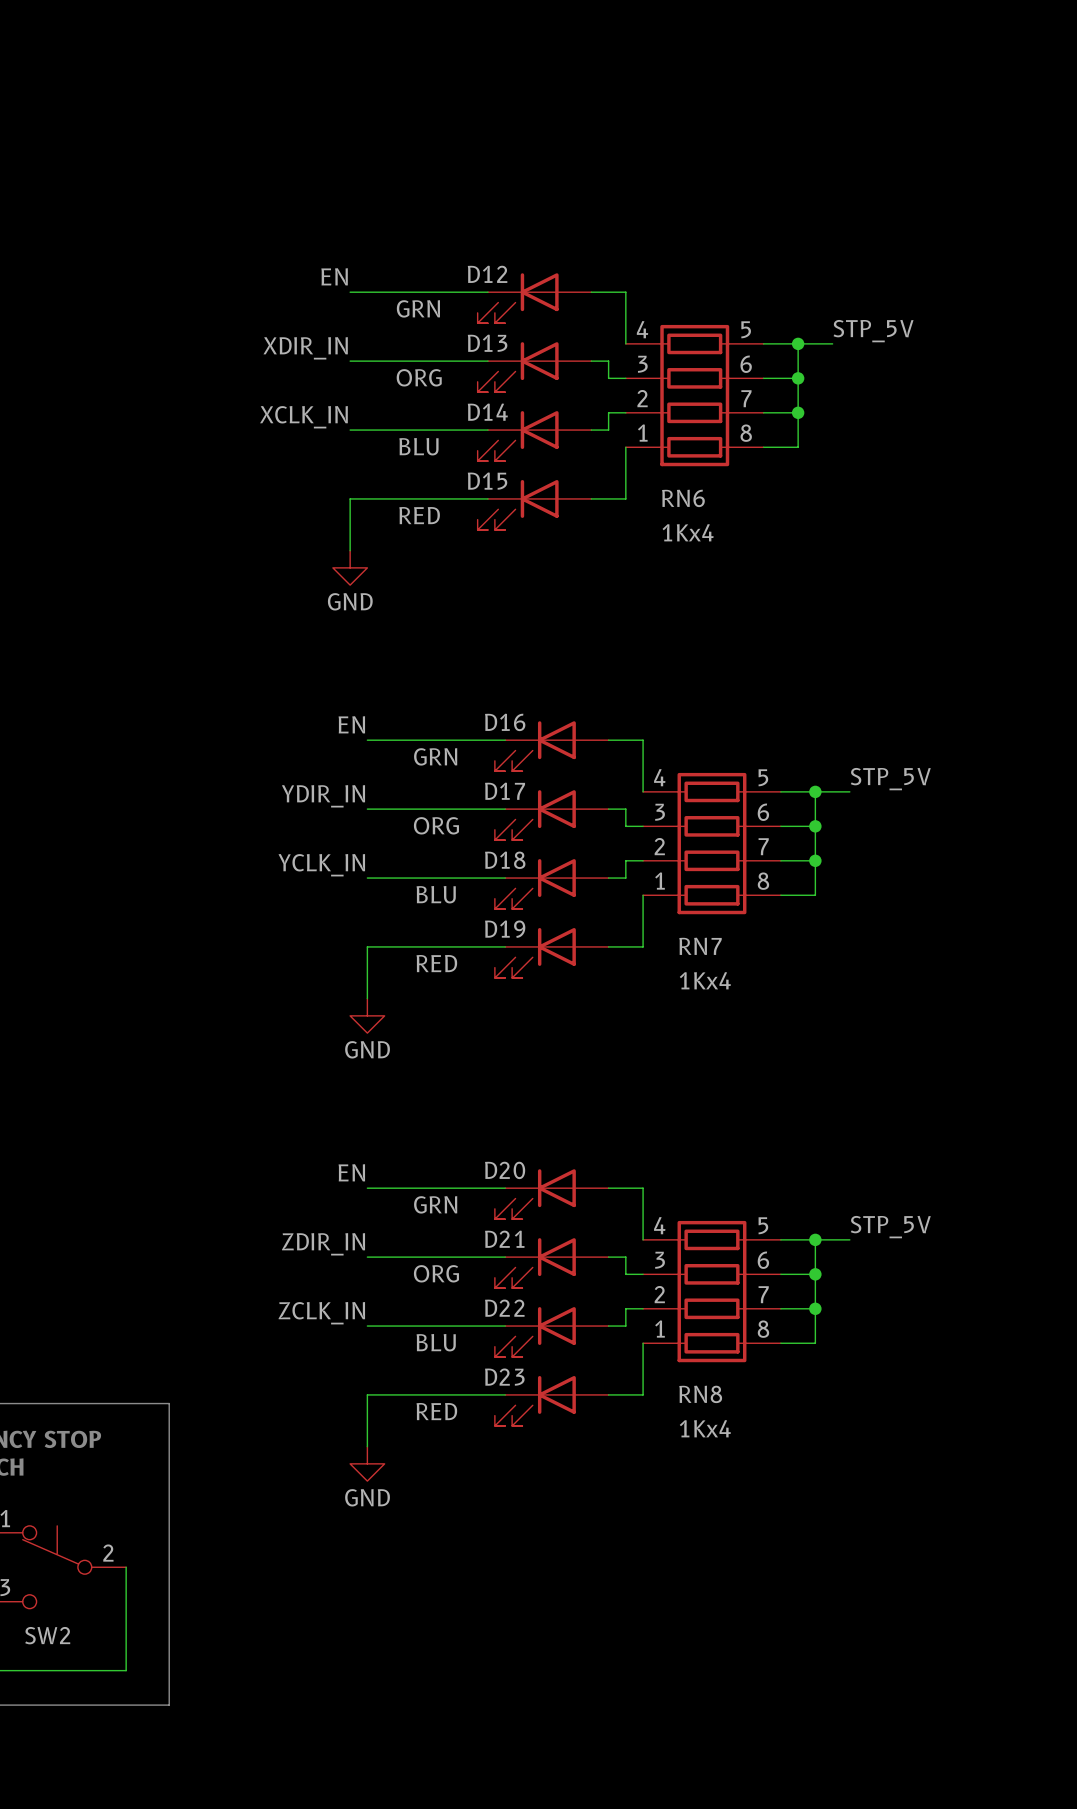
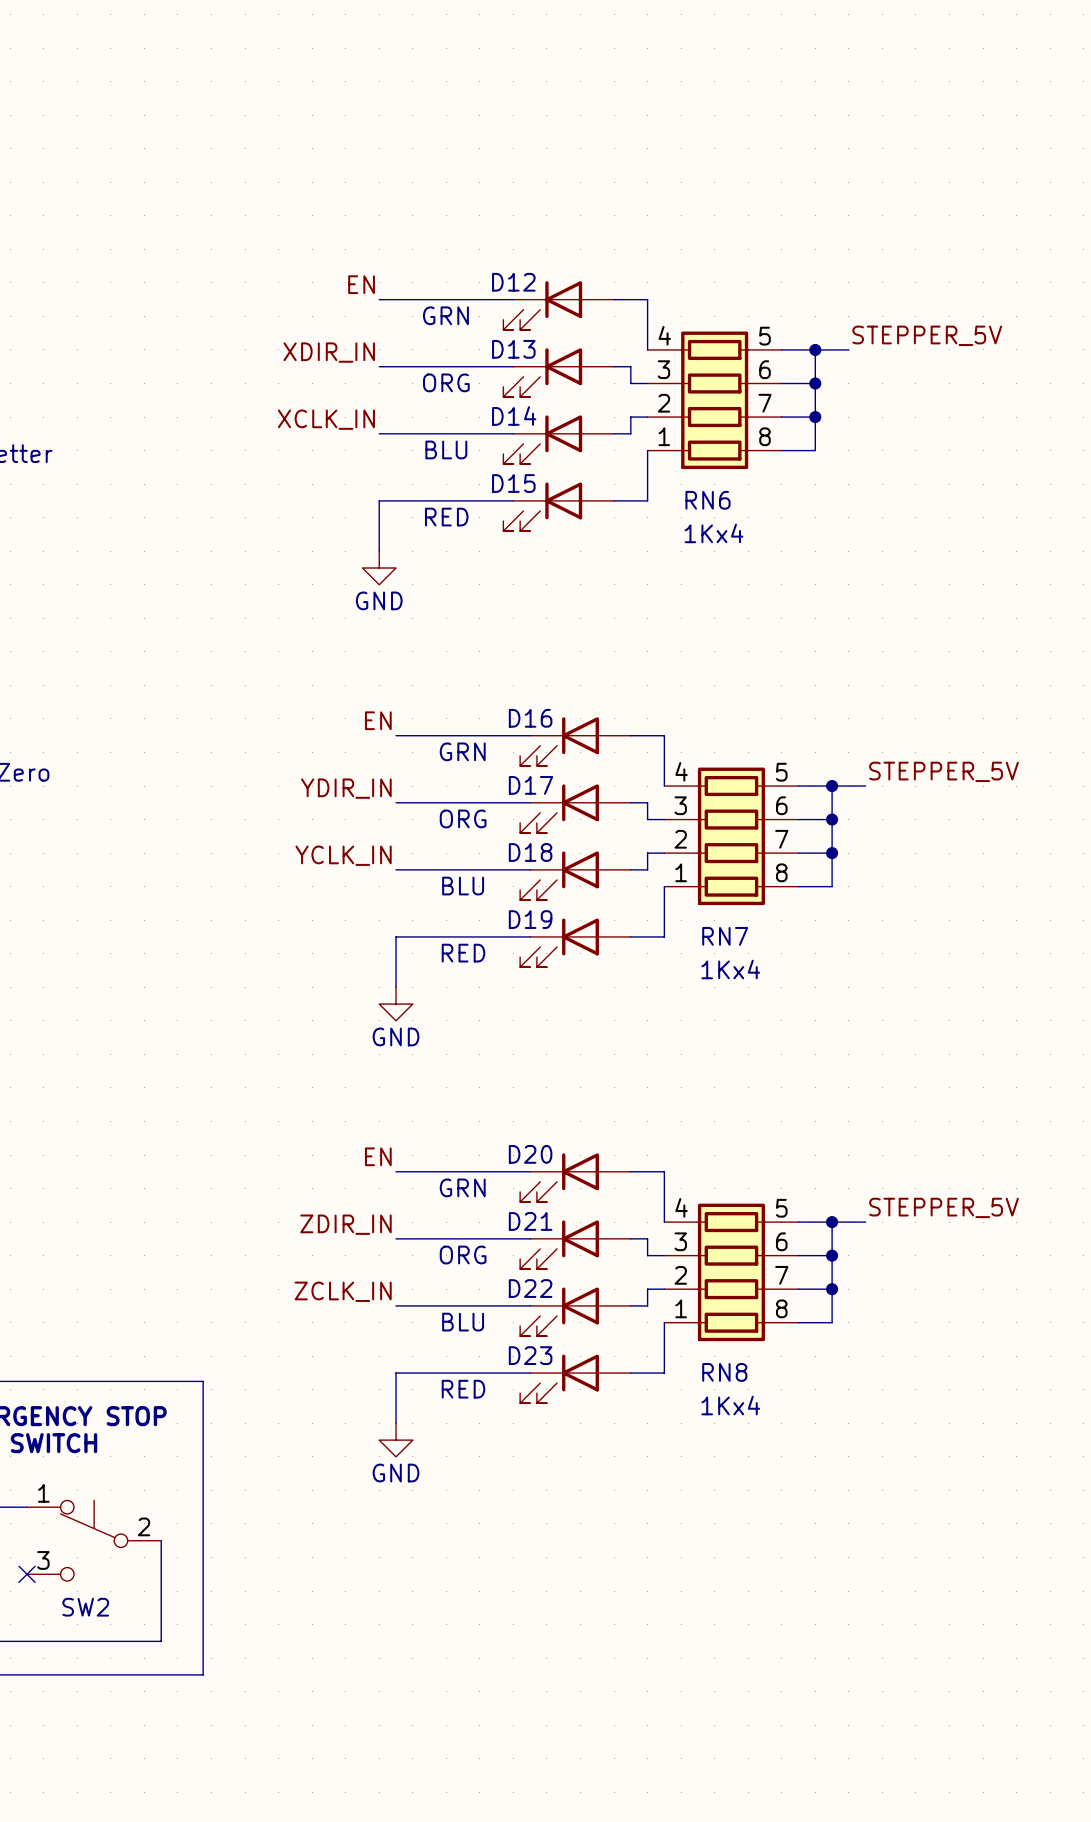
label: STP_5V (873, 331) -> STEPPER_5V (927, 335)
label: STP_5V (890, 779) -> STEPPER_5V (944, 771)
label: STP_5V (890, 1227) -> STEPPER_5V (944, 1207)

